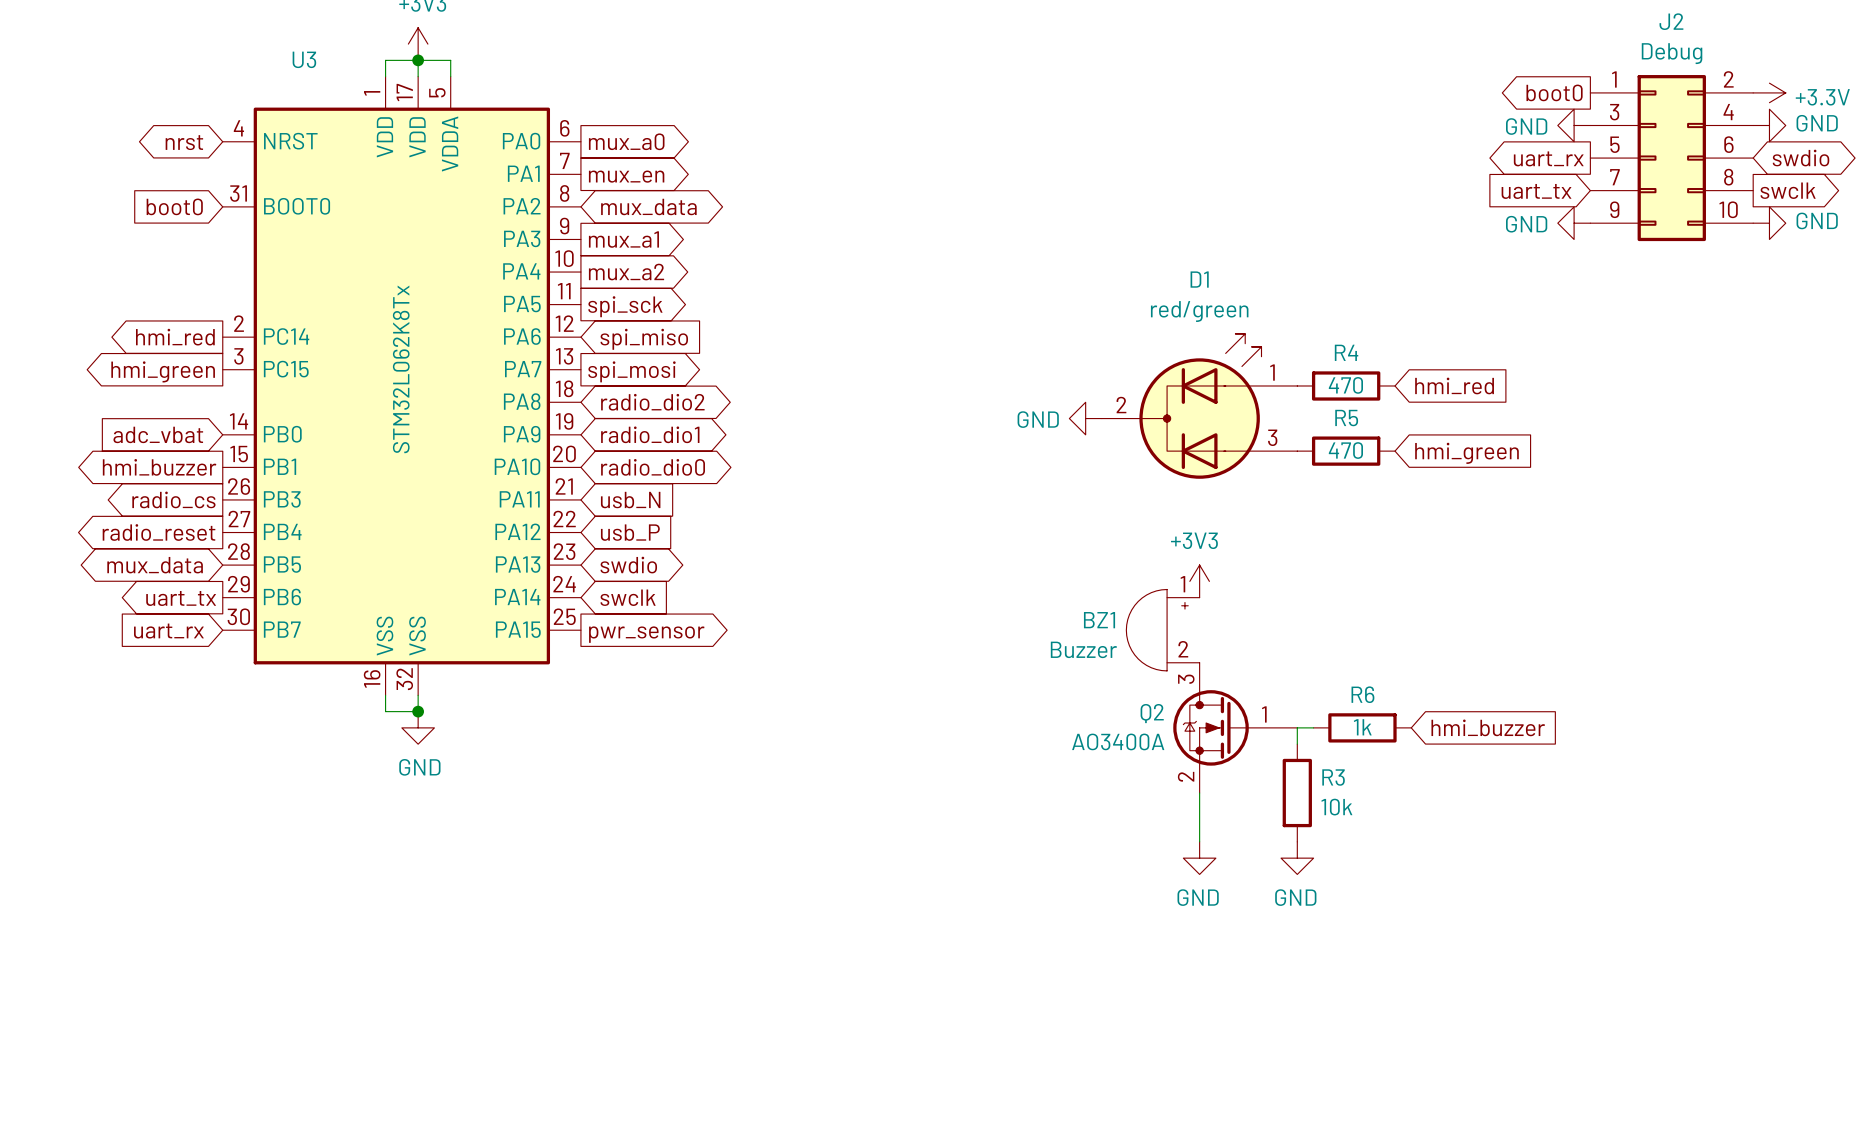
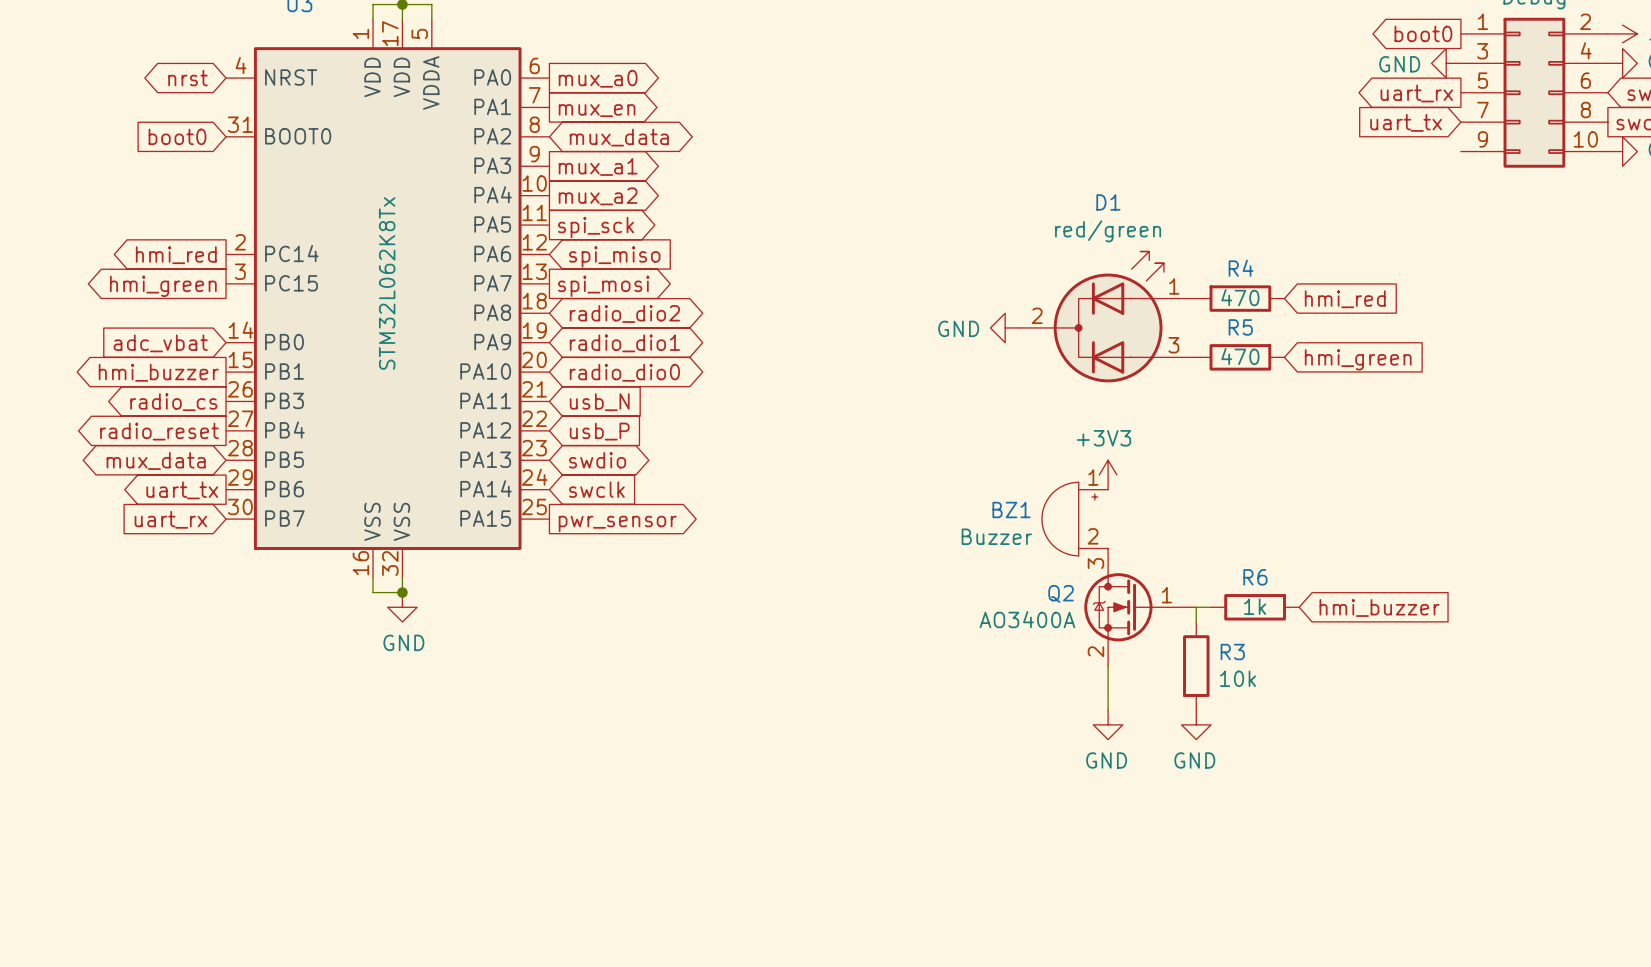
power symbol: GND (1574, 223) -> none

